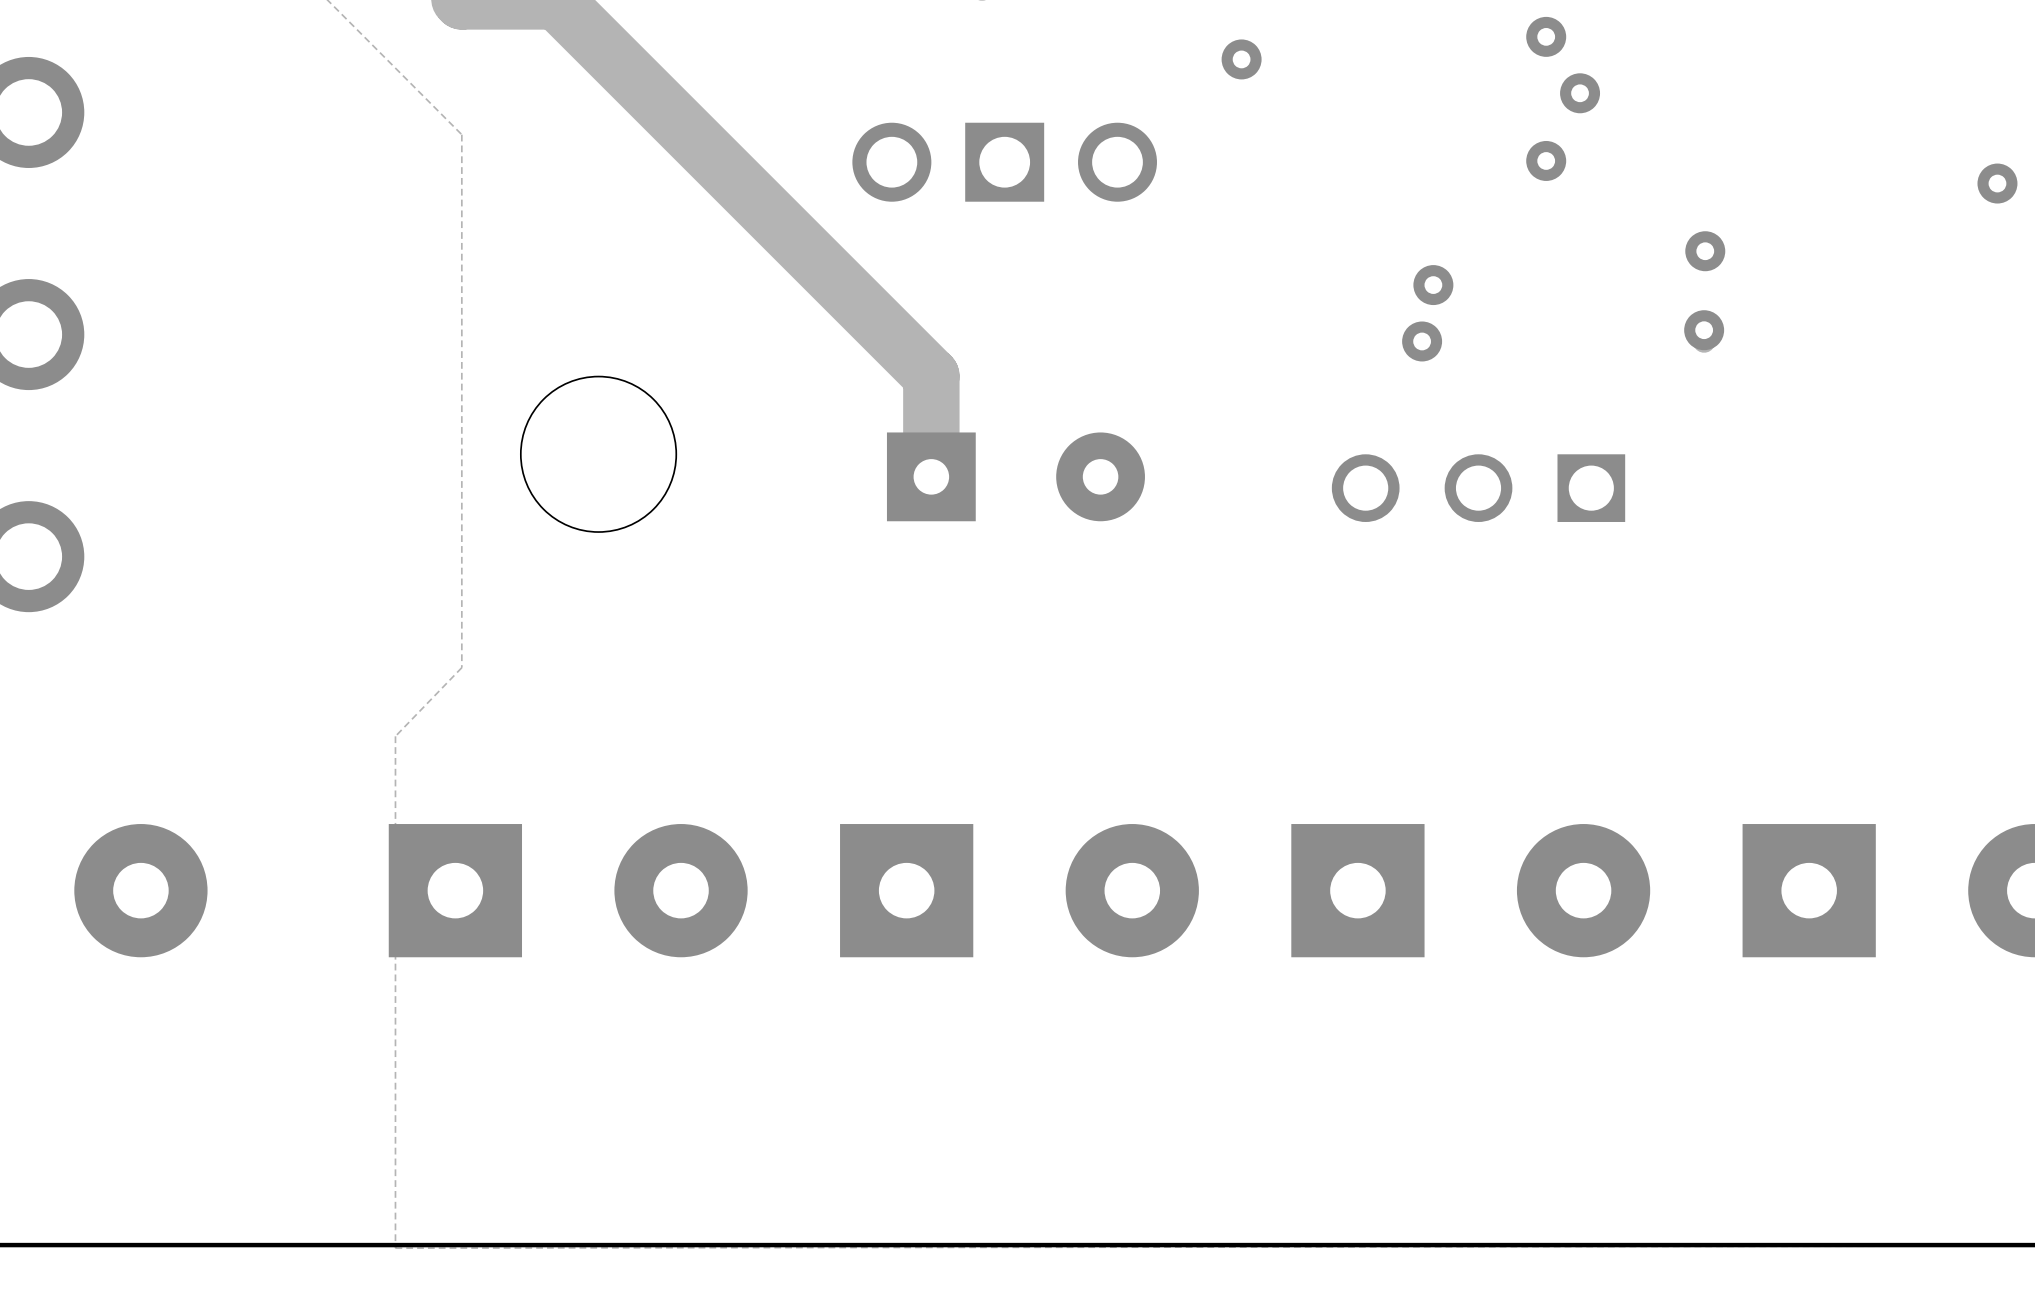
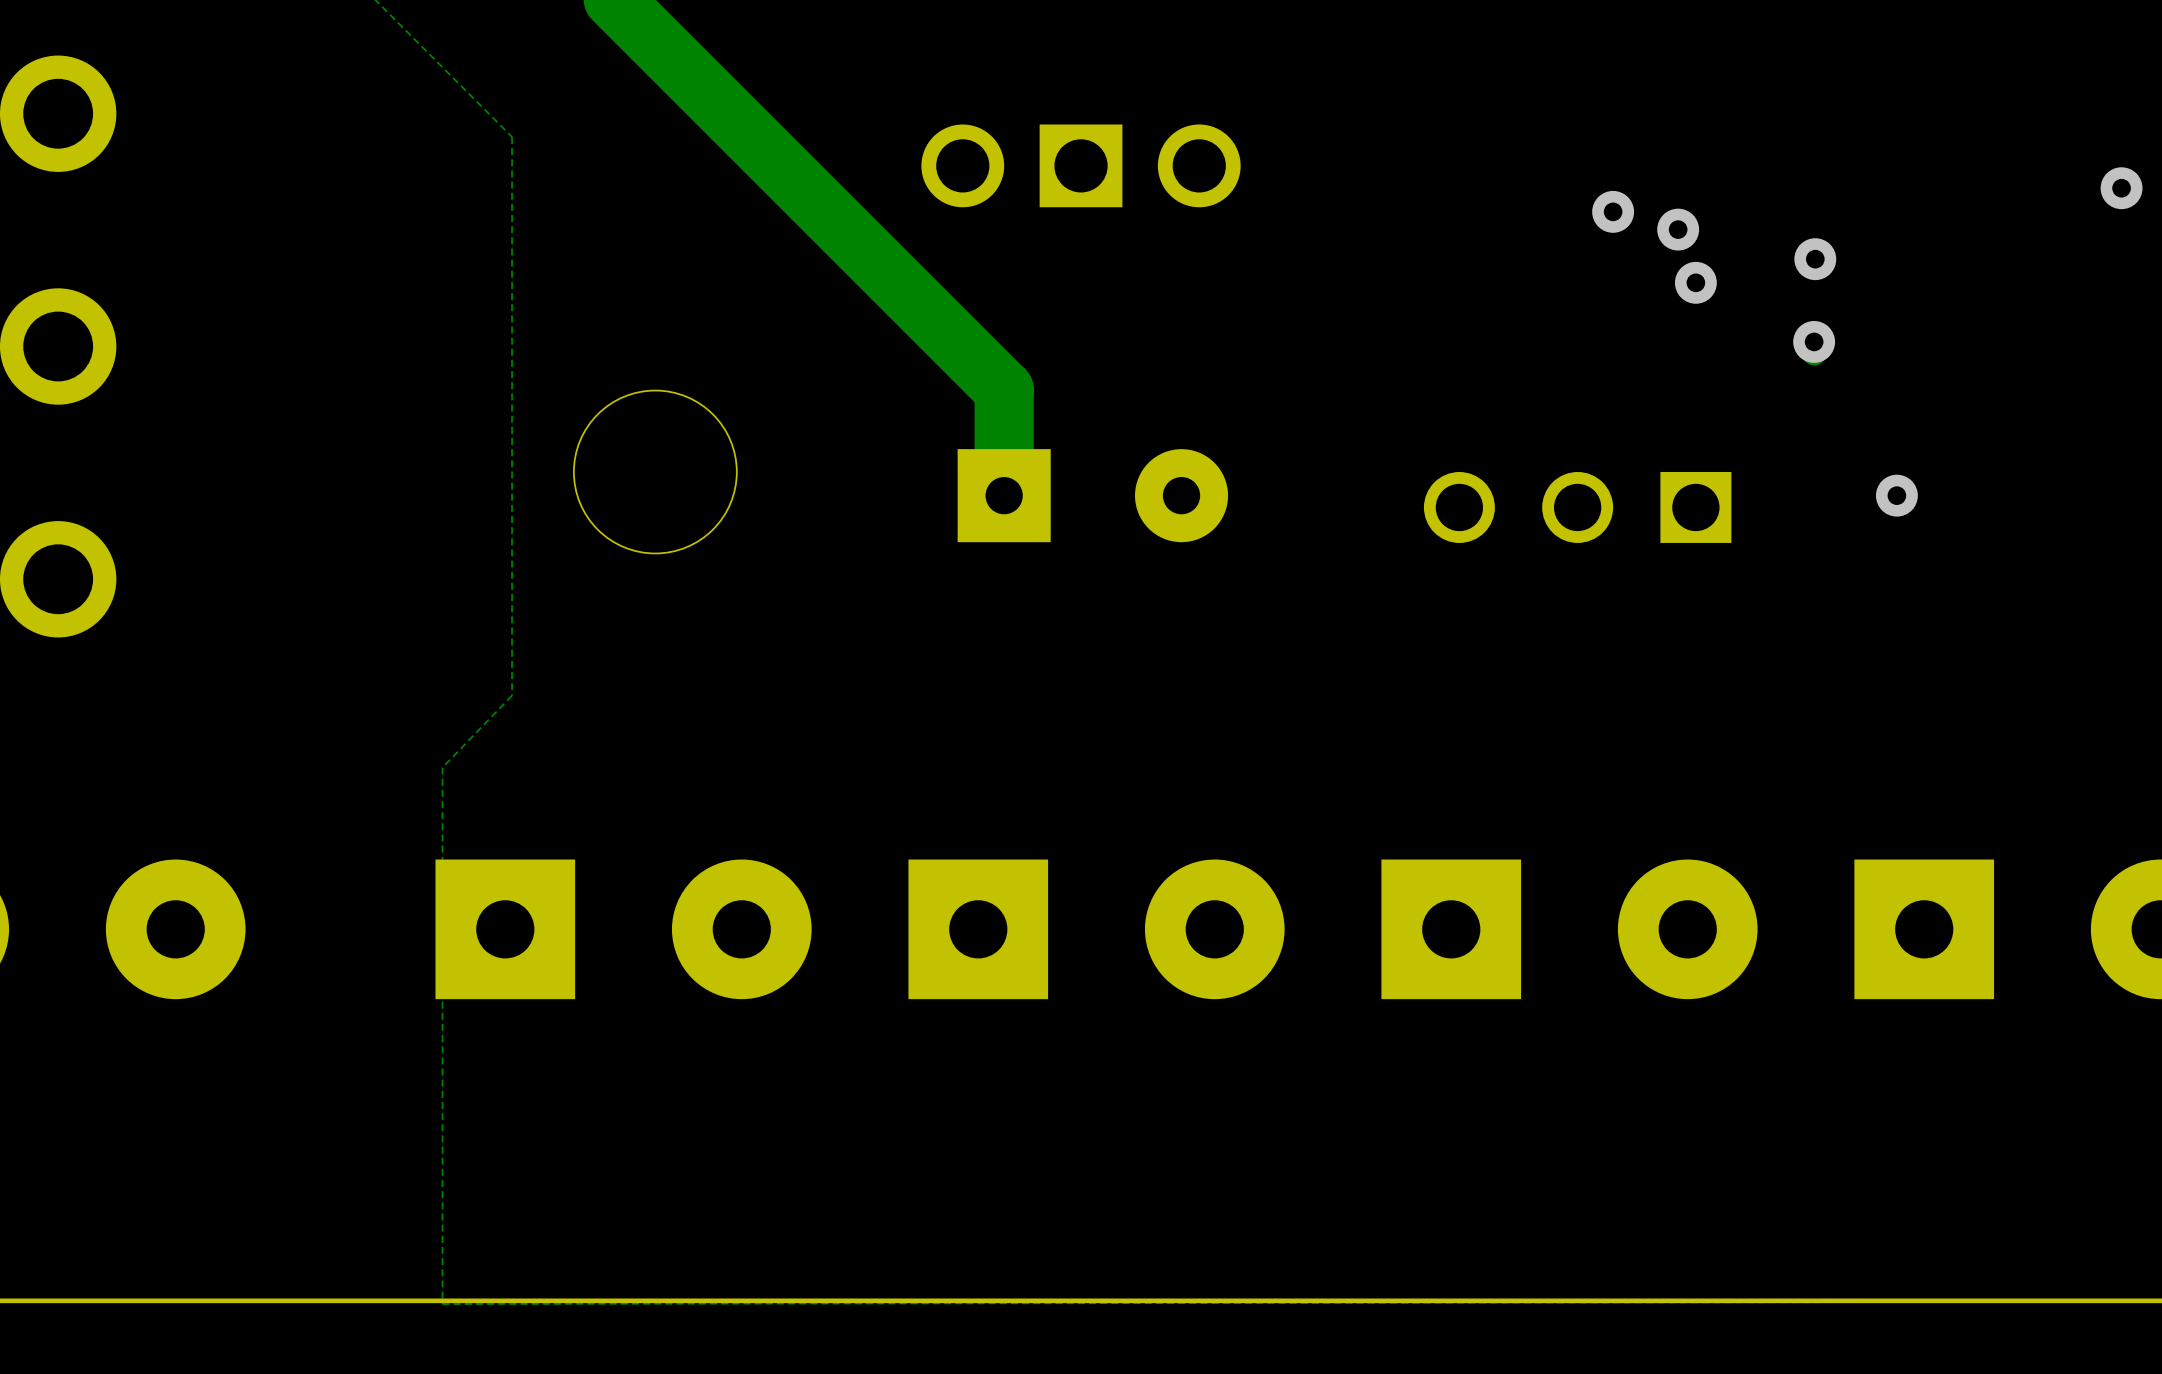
via: (1546, 36) -> none
via: (1241, 59) -> none
via: (1580, 93) -> none
via: (1546, 160) -> none
via: none -> (1613, 211)
via: none -> (1678, 229)
via: none -> (1695, 282)
via: (1433, 285) -> none
via: (1422, 341) -> none
via: none -> (1896, 495)

